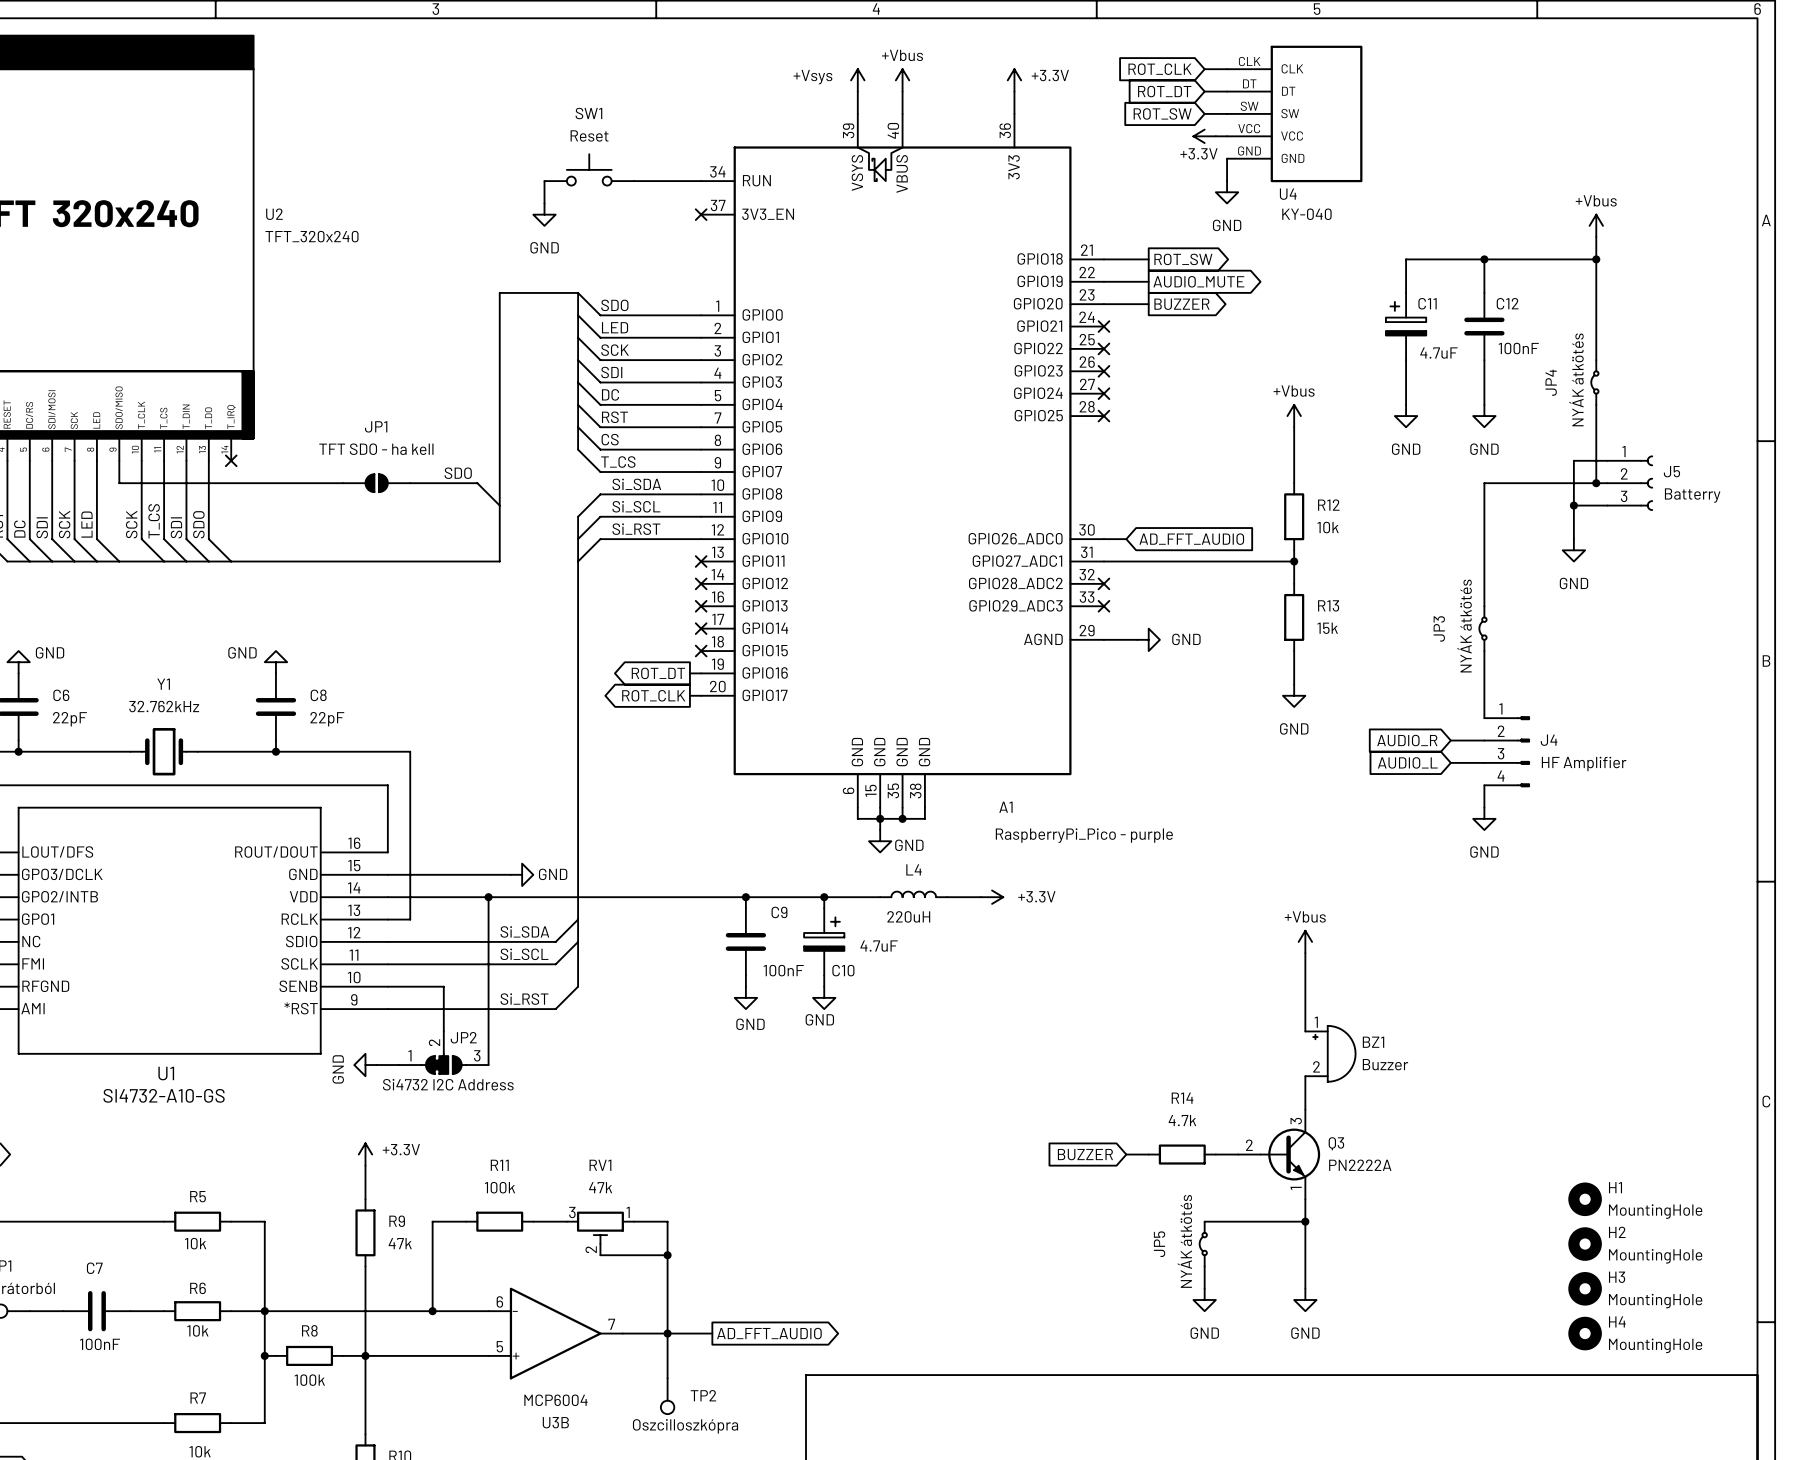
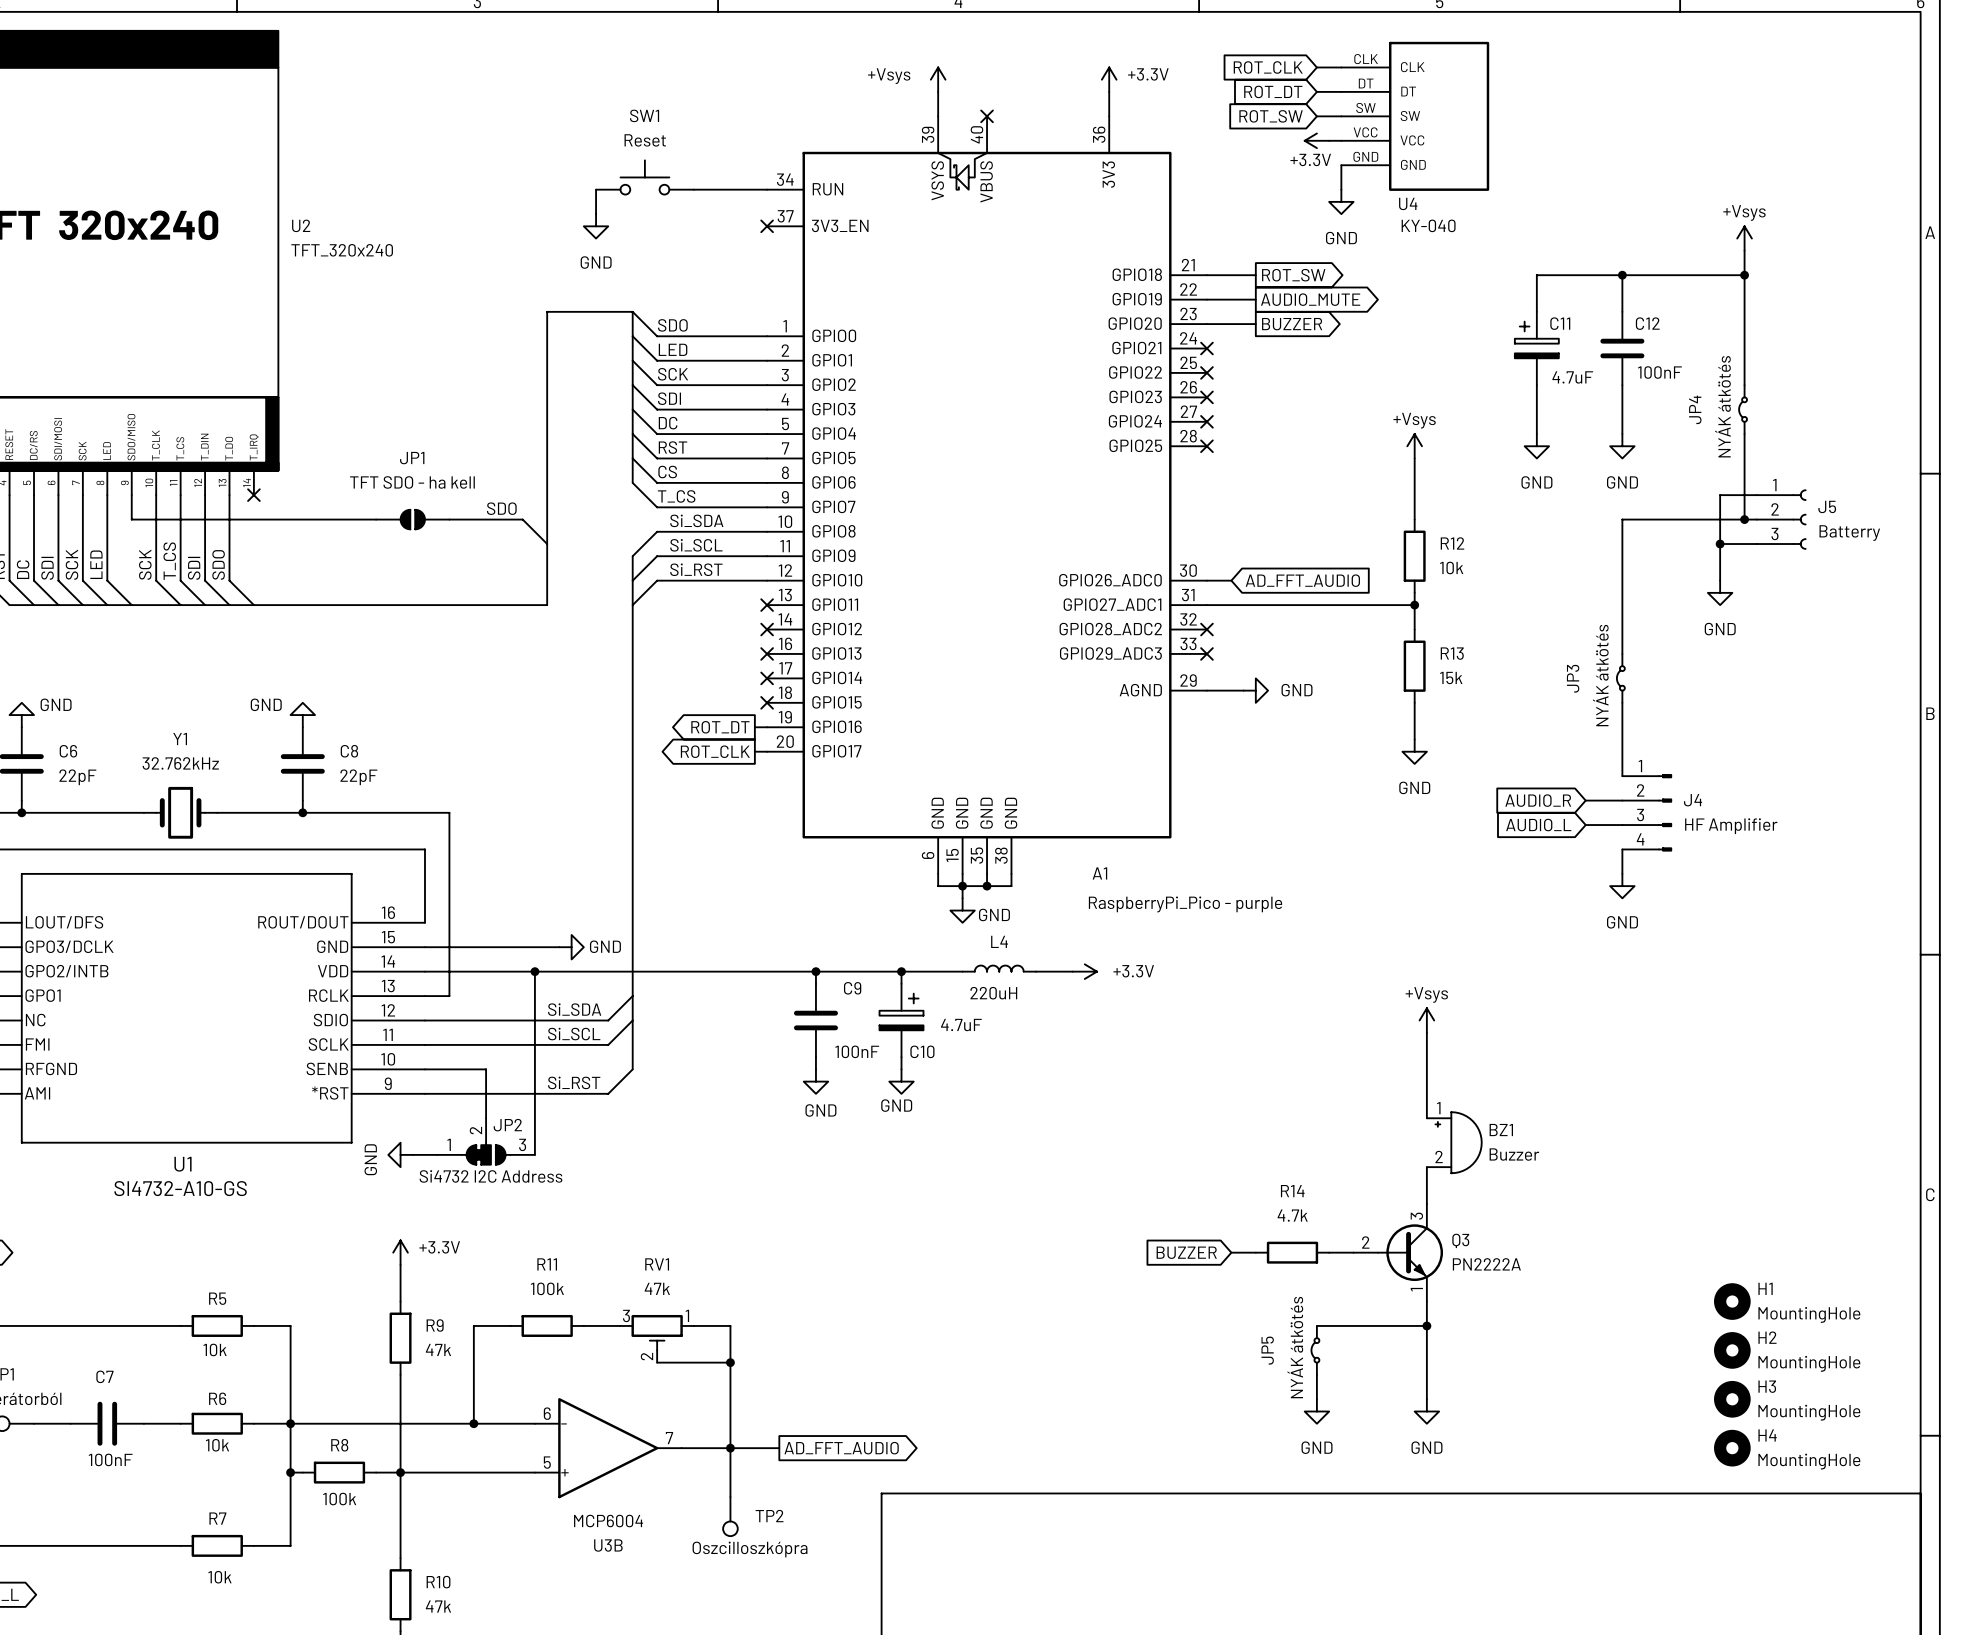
power symbol: +Vbus (902, 80) -> none
wire: (902, 91) (902, 113) -> none
no-connect mark: none -> (987, 116)
power symbol: +Vbus (1596, 225) -> +Vsys (1744, 238)
power symbol: +Vbus (1294, 416) -> +Vsys (1414, 446)
power symbol: +Vbus (1305, 941) -> +Vsys (1426, 1020)

